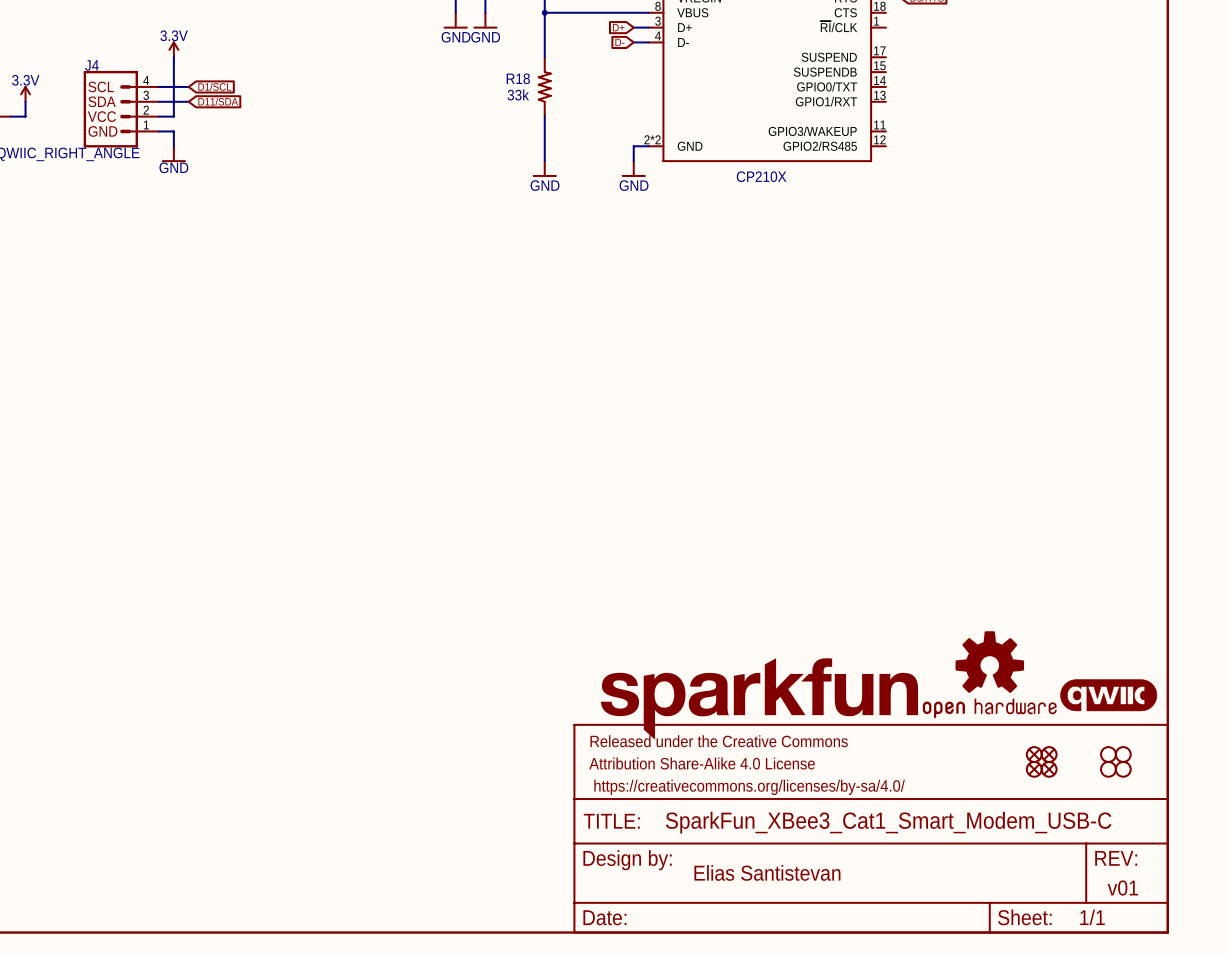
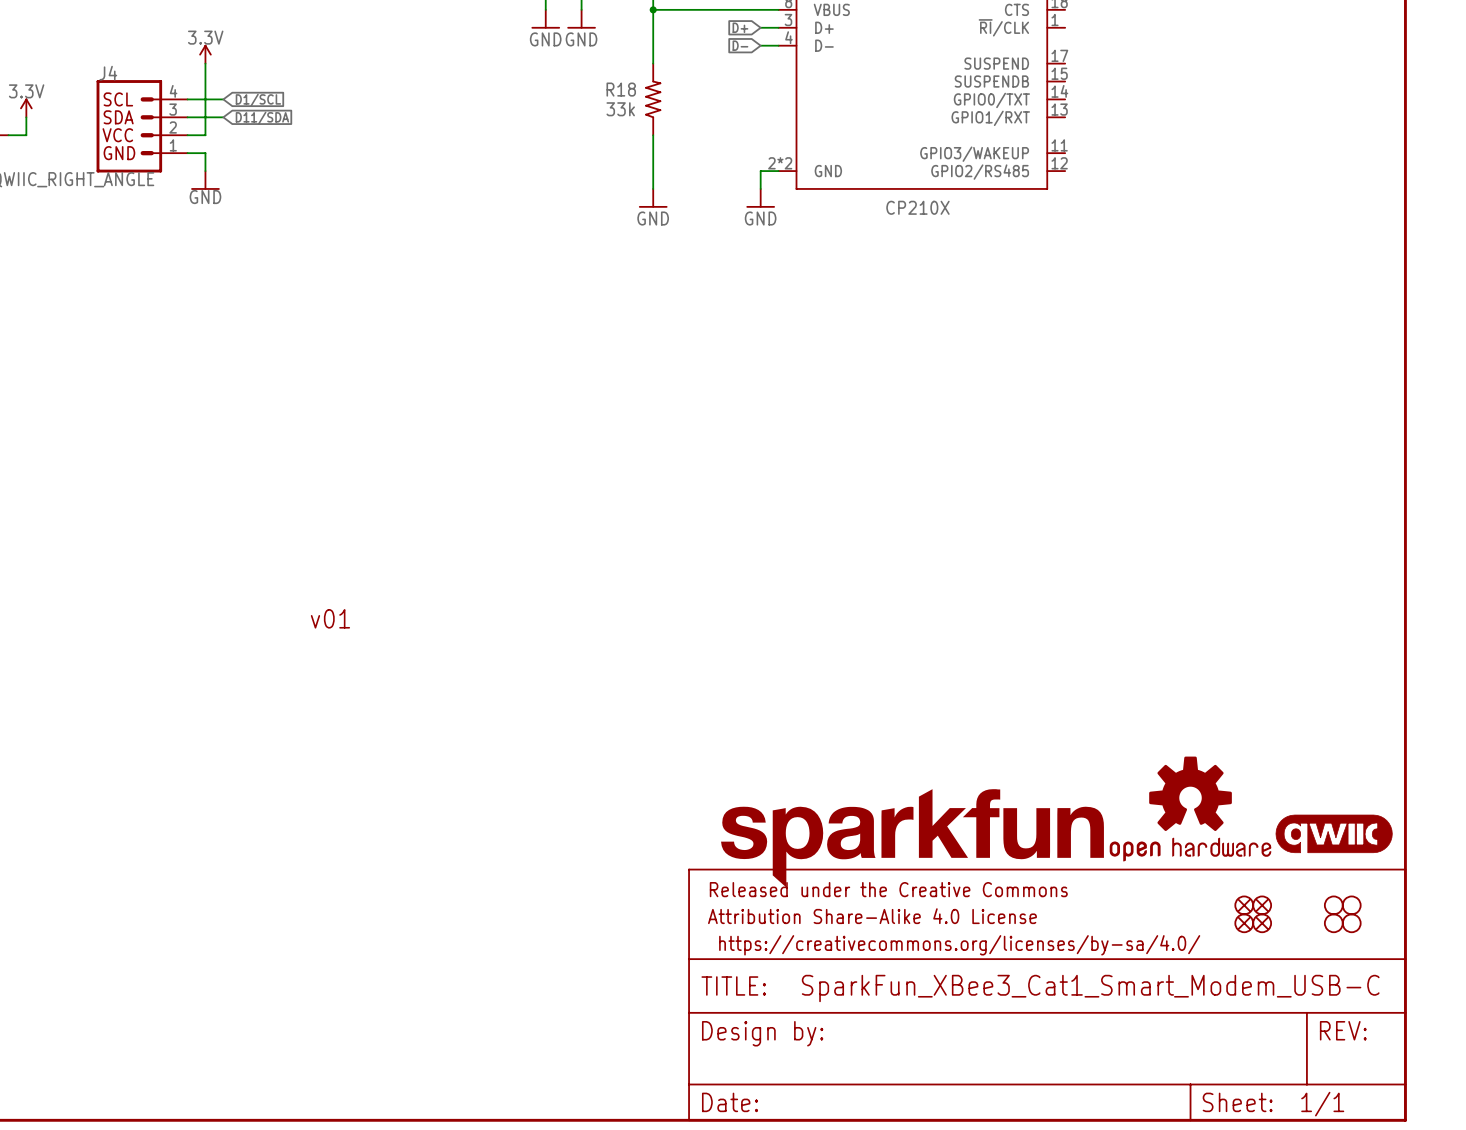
text: none -> v01 (330, 618)
text: Elias Santistevan (767, 872) -> none
text: v01 (1122, 888) -> none

